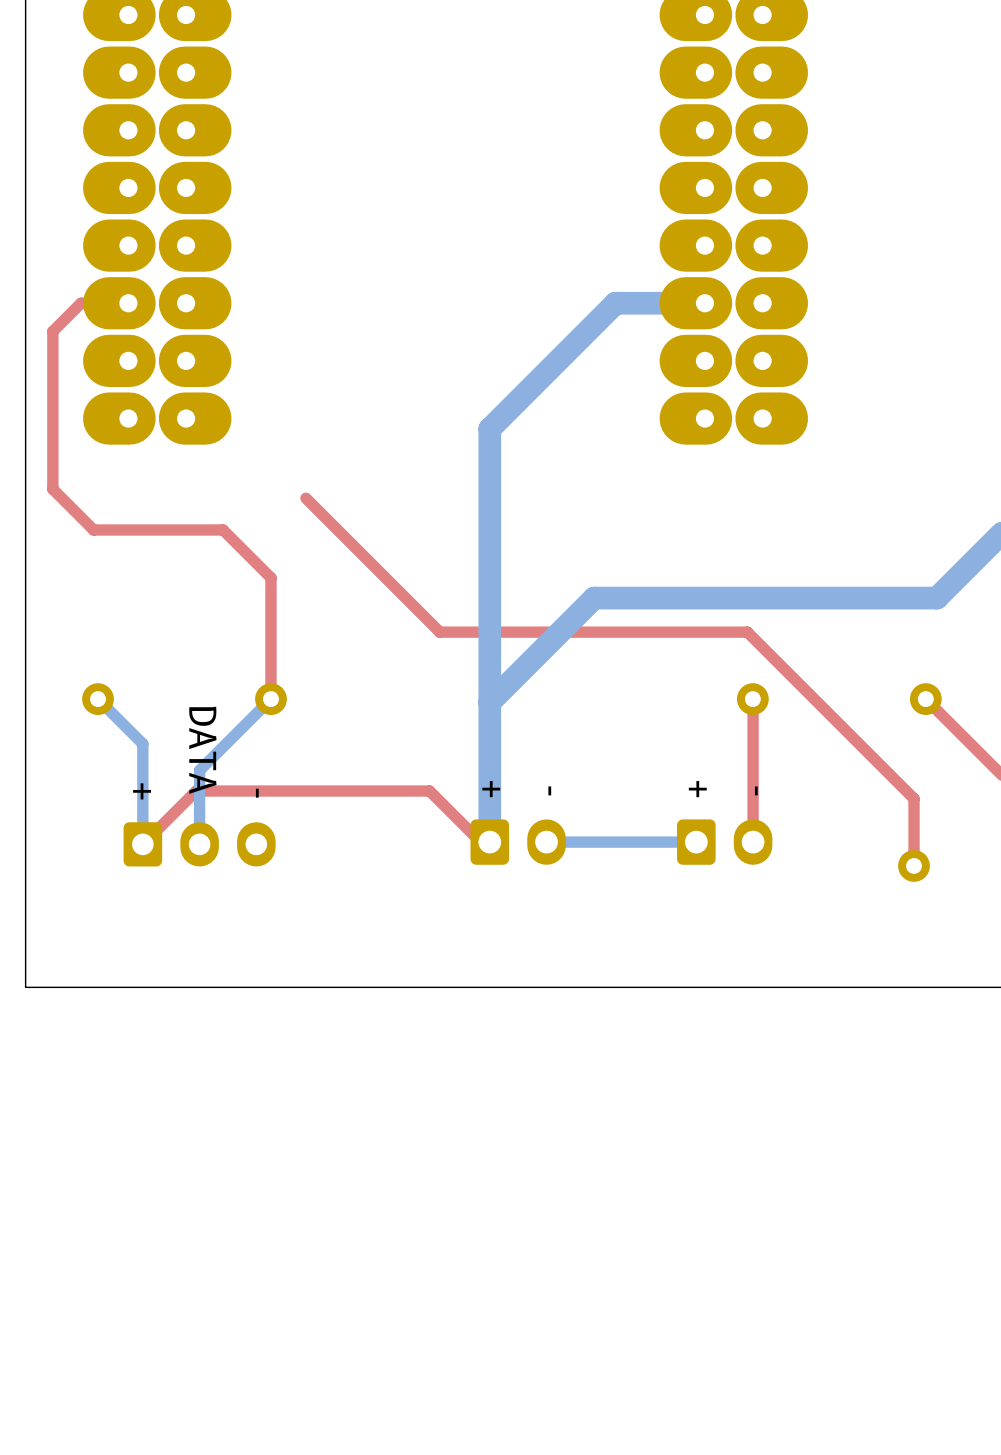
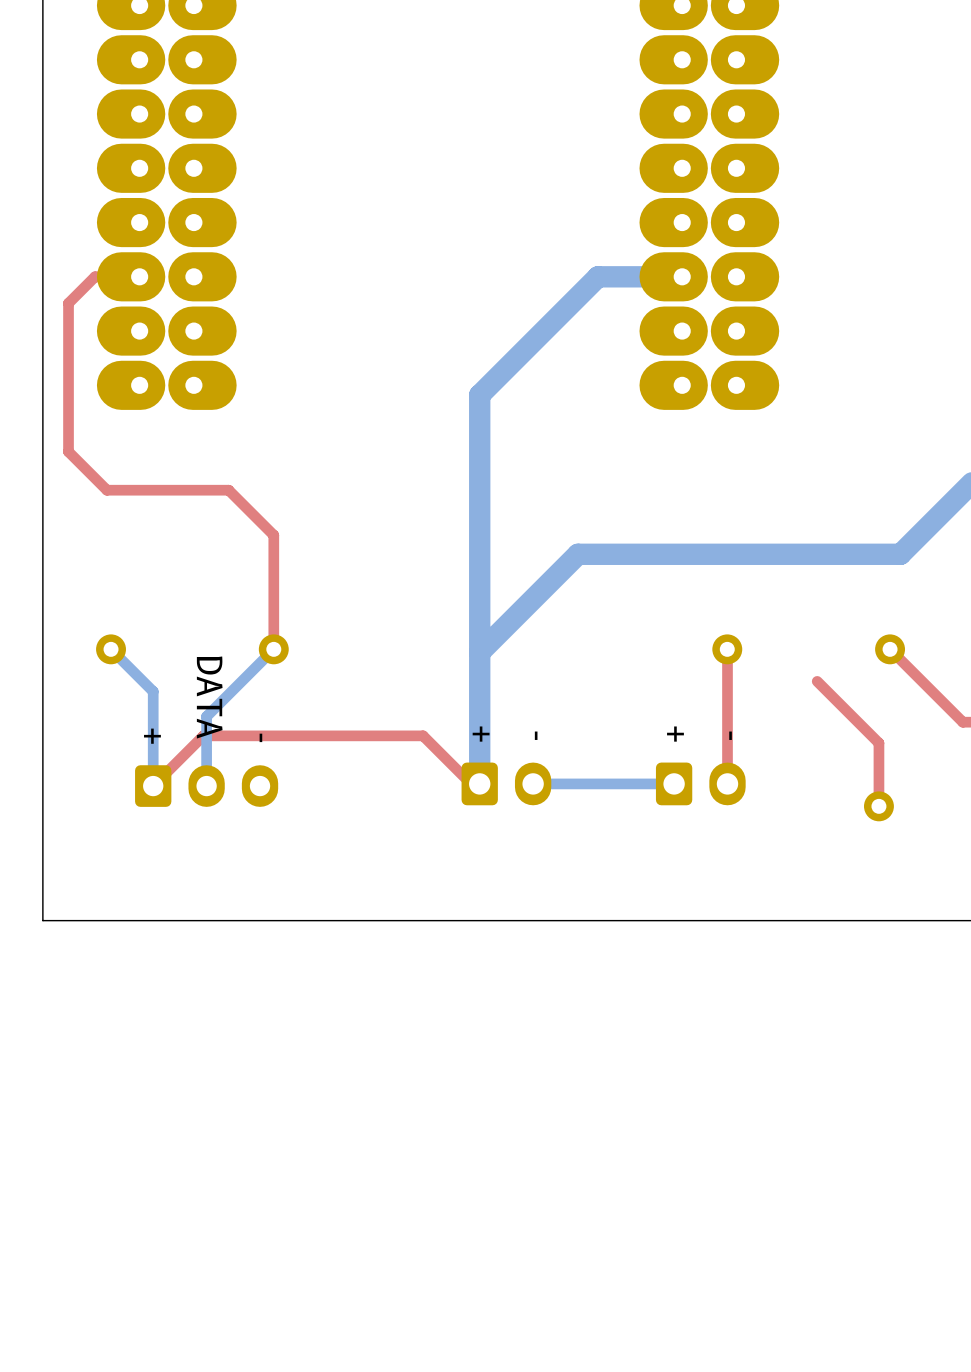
top track: (305, 498) (439, 632) (747, 632) (848, 733) -> none

